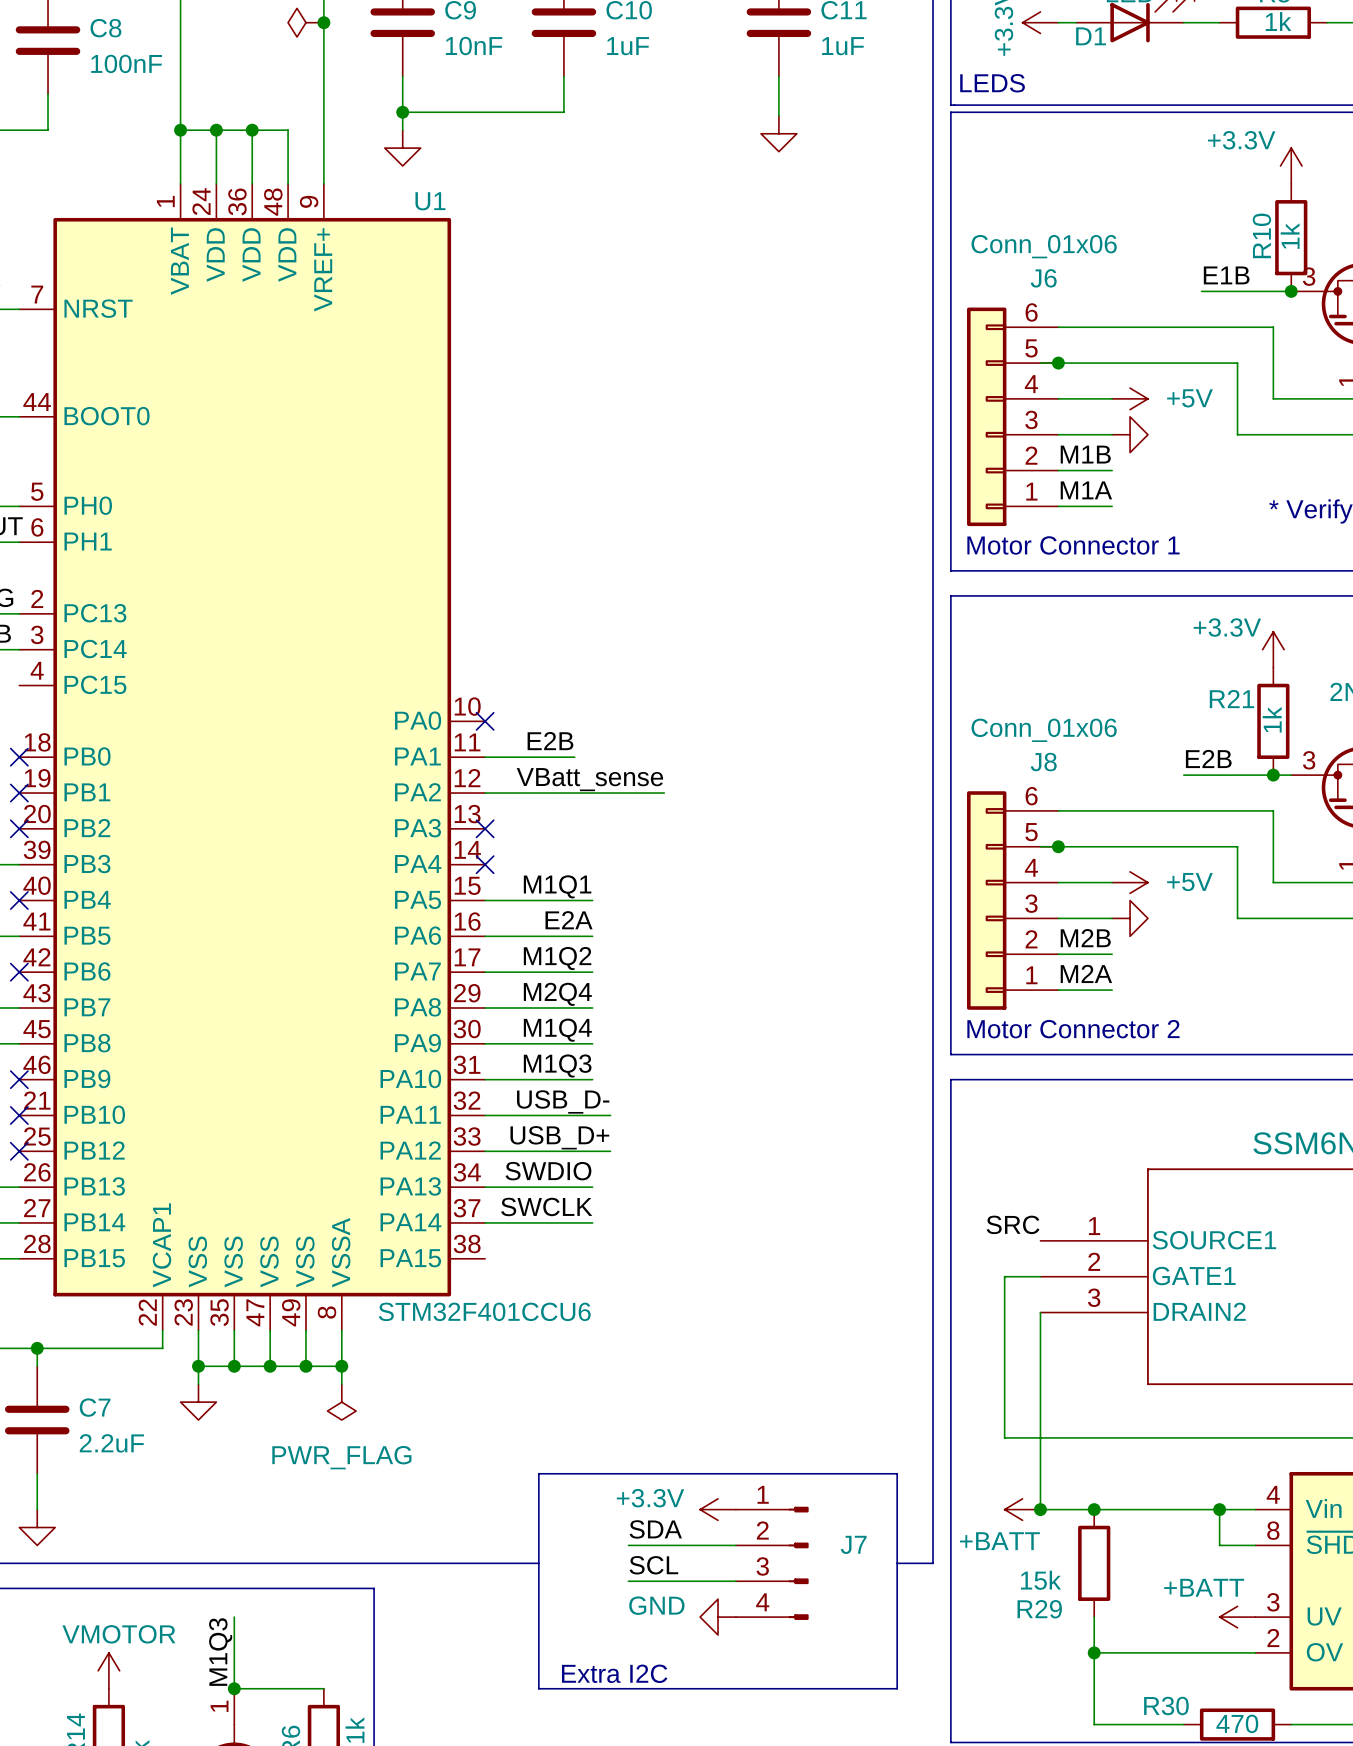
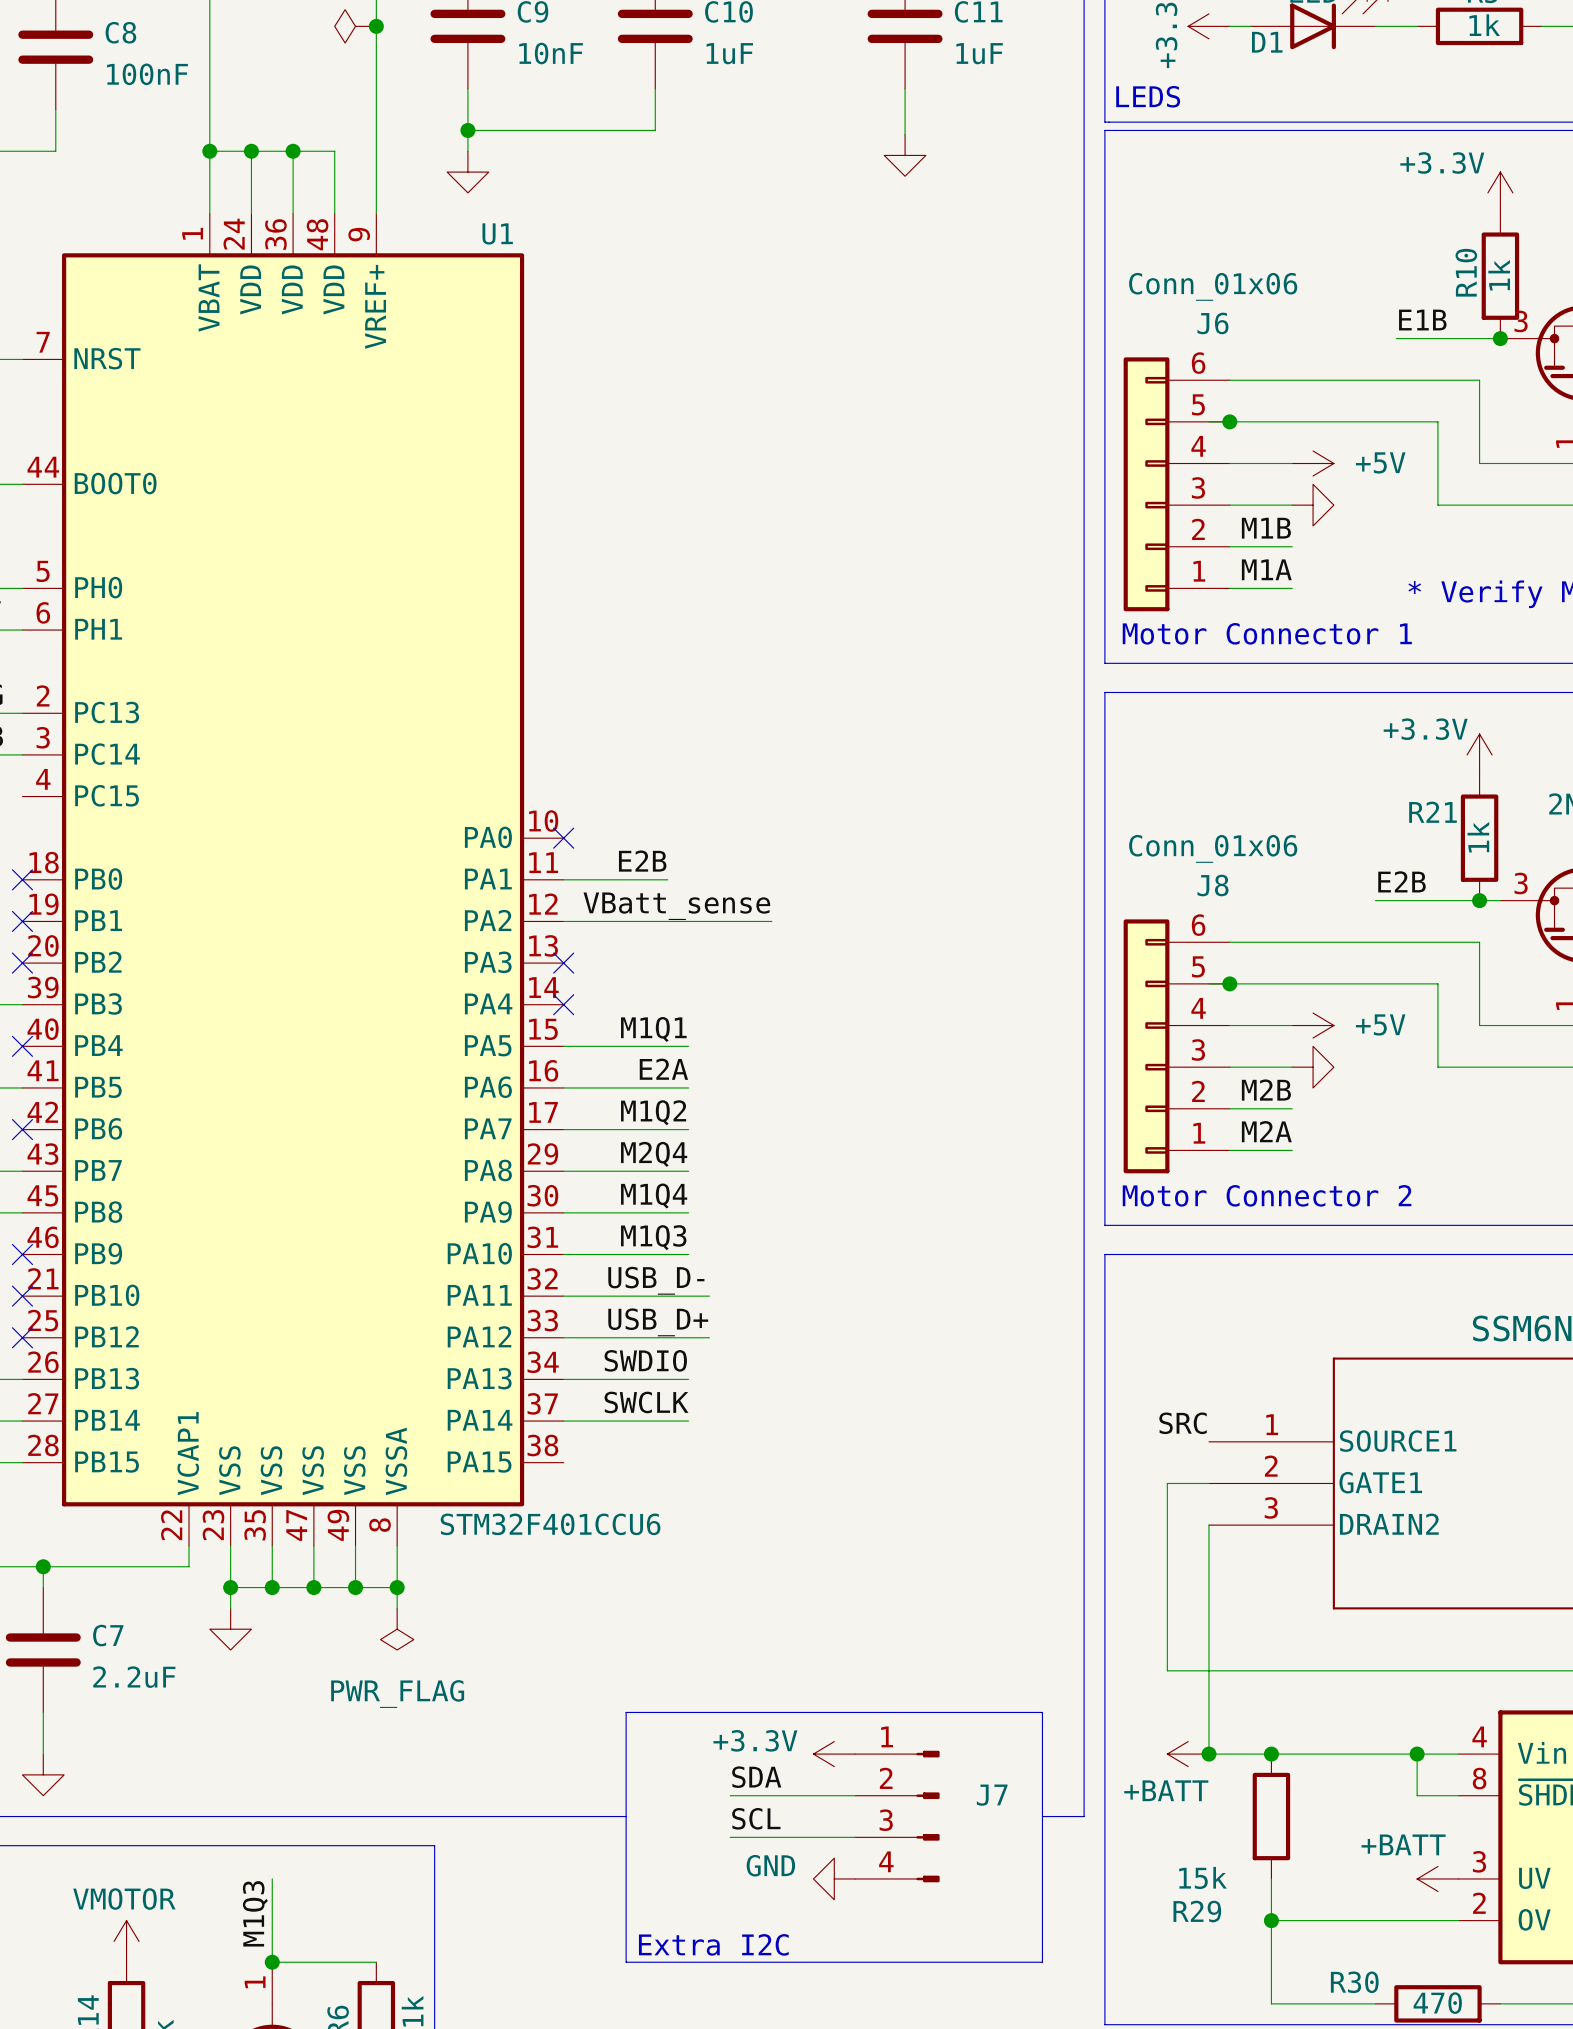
R29 value position: 15k (1040, 1580) -> 15k (1202, 1877)
R29 name position: R29 (1039, 1609) -> R29 (1197, 1911)

